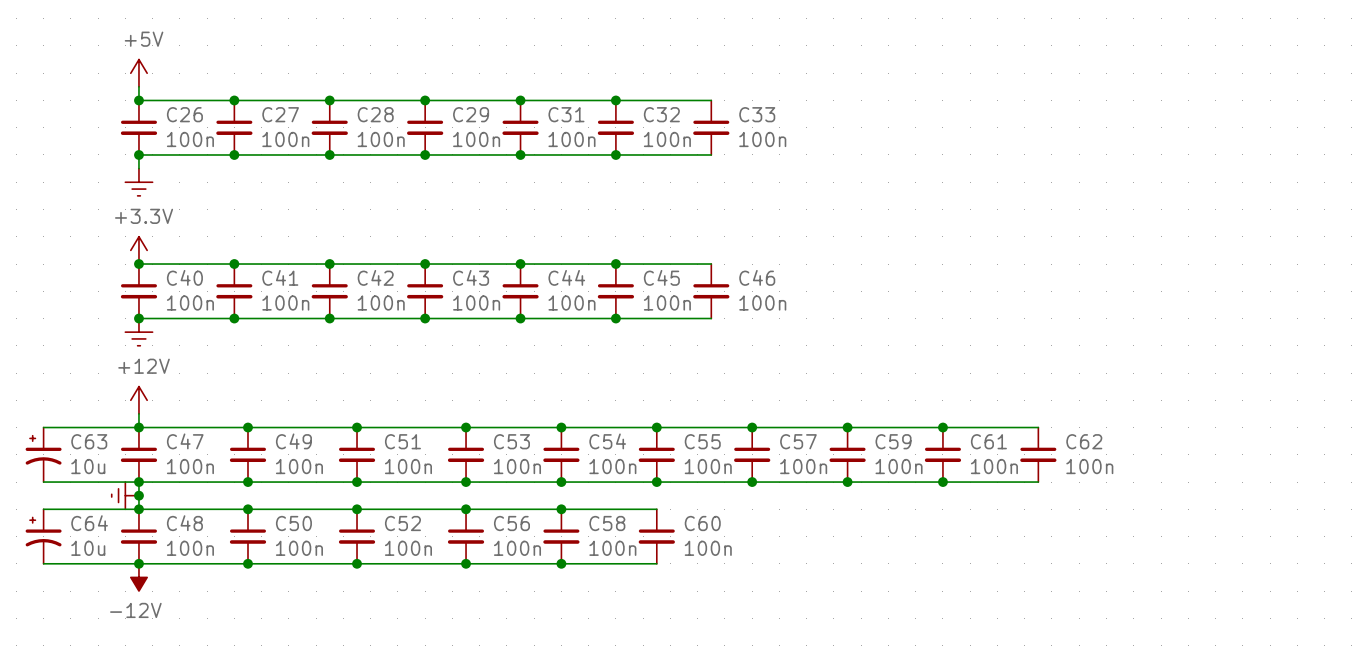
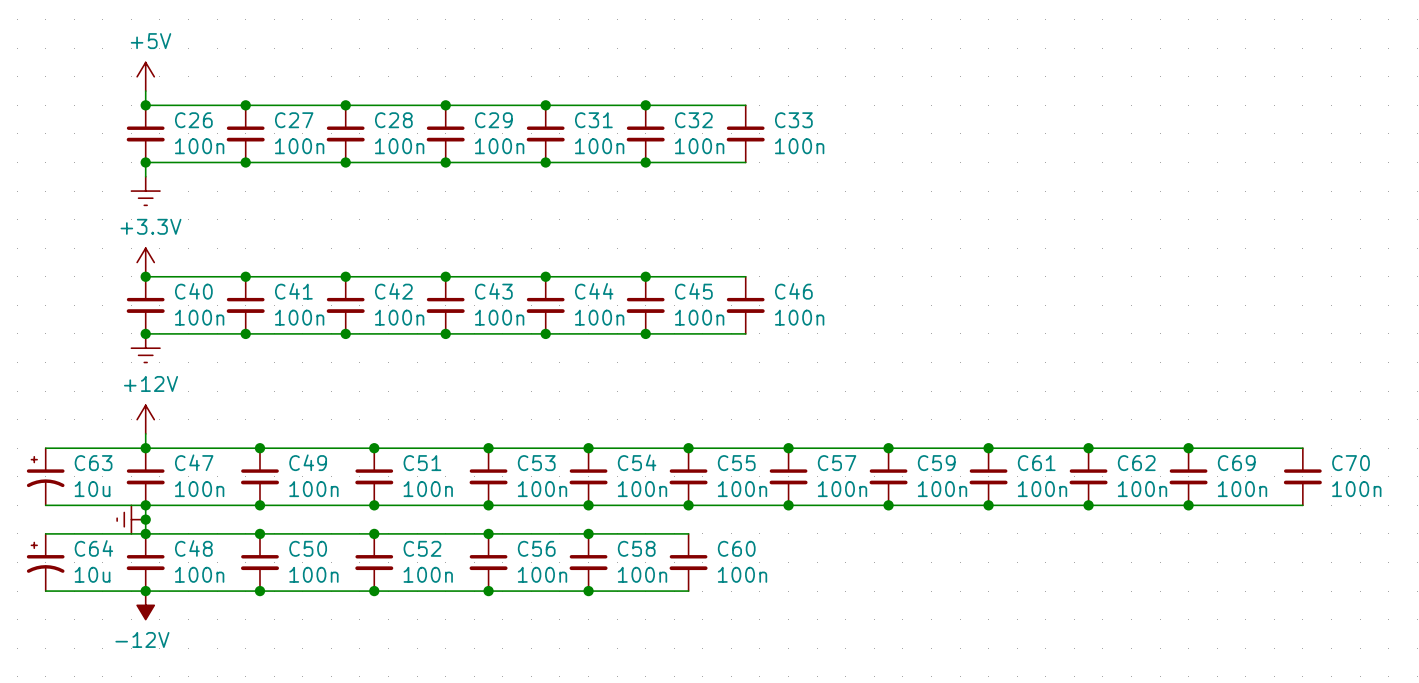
wire: none -> (1088, 448) (1302, 448)
junction: none -> (1088, 448)
junction: none -> (1188, 448)
C69: none -> 100n (1188, 476)
C70: none -> 100n (1302, 476)
wire: none -> (1088, 505) (1302, 505)
junction: none -> (1088, 505)
junction: none -> (1188, 505)

